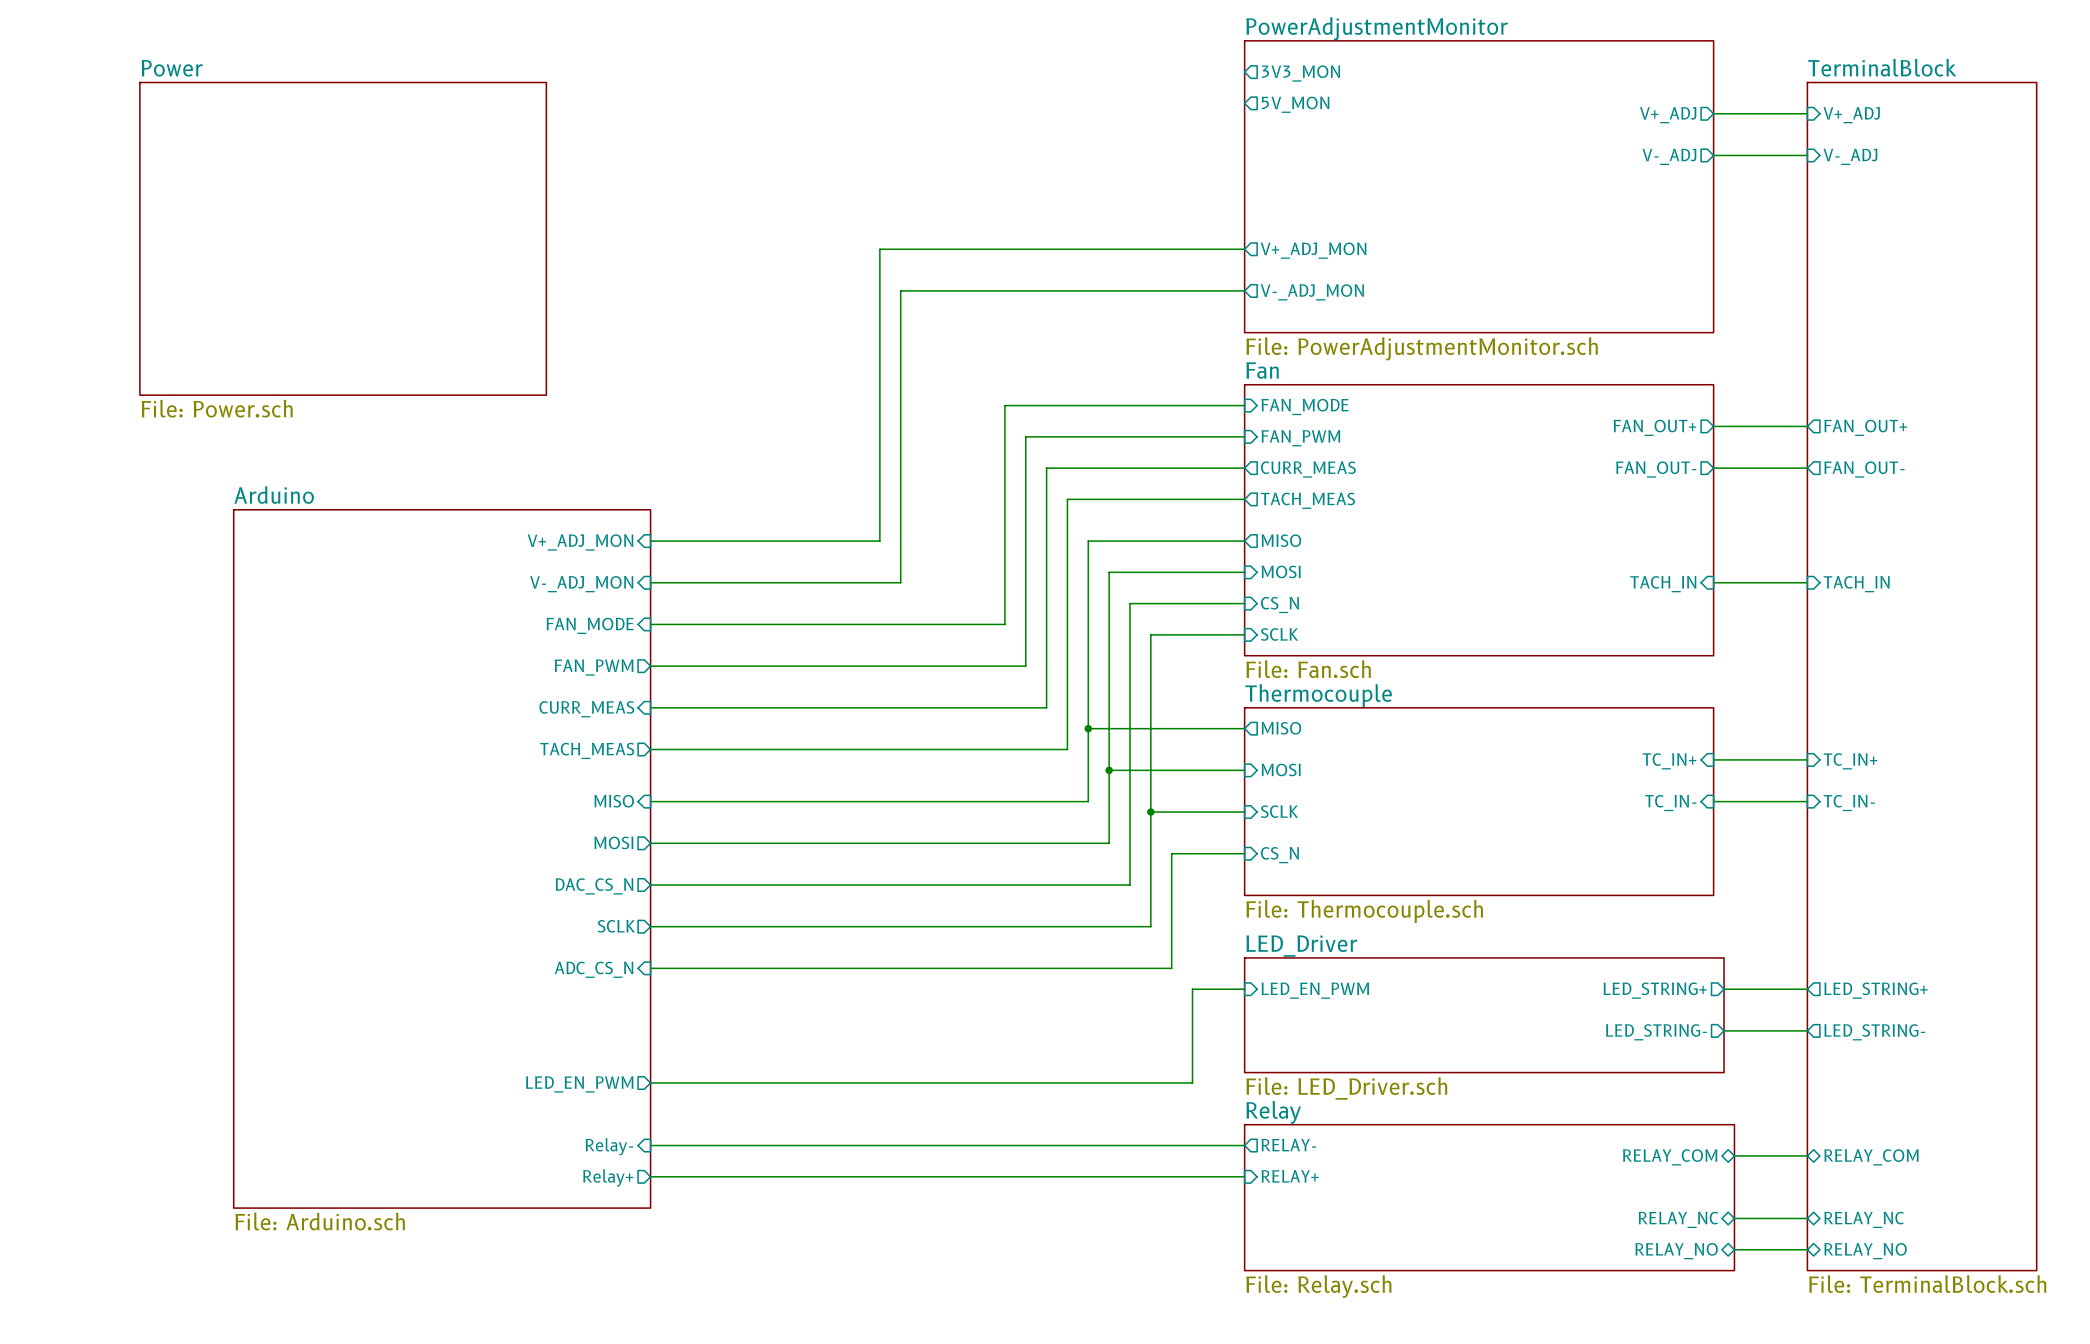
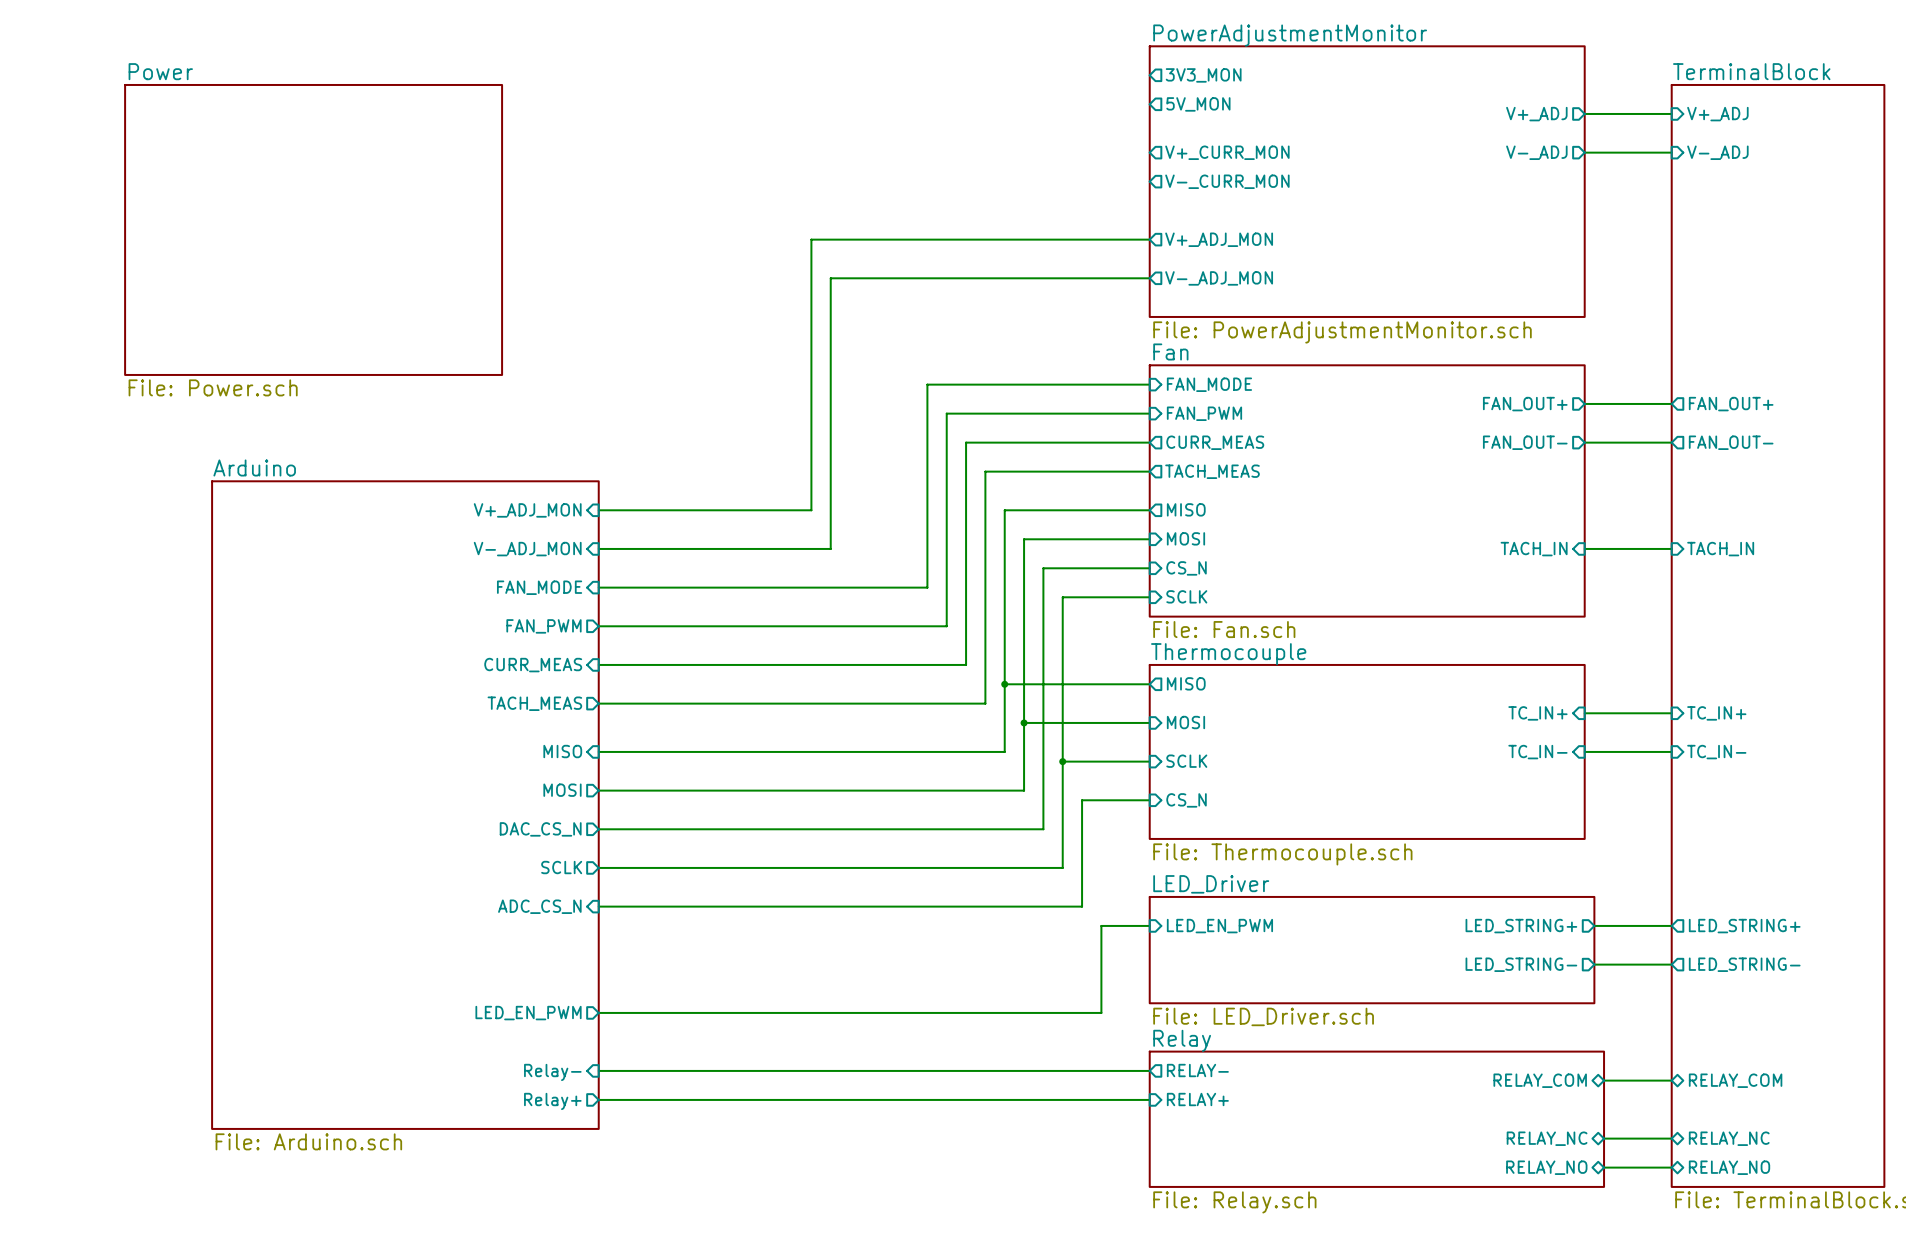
sheet pin: none -> V+_CURR_MON (1227, 152)
sheet pin: none -> V-_CURR_MON (1227, 181)

